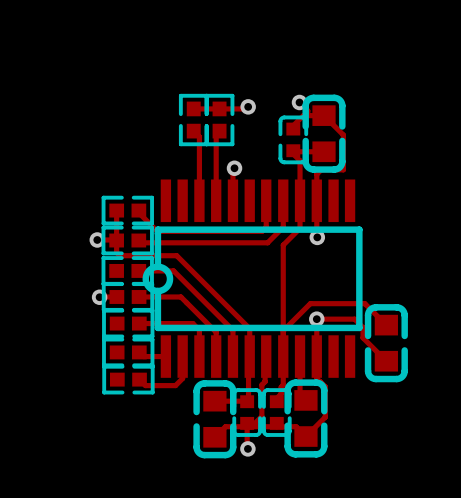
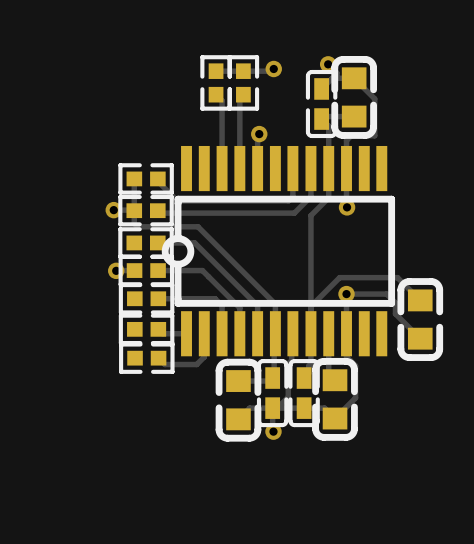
part footprint: [278, 115, 309, 165] -> [305, 69, 338, 139]
part footprint: [232, 388, 262, 437] -> [256, 359, 289, 428]
part footprint: [261, 388, 292, 437] -> [288, 359, 320, 428]

